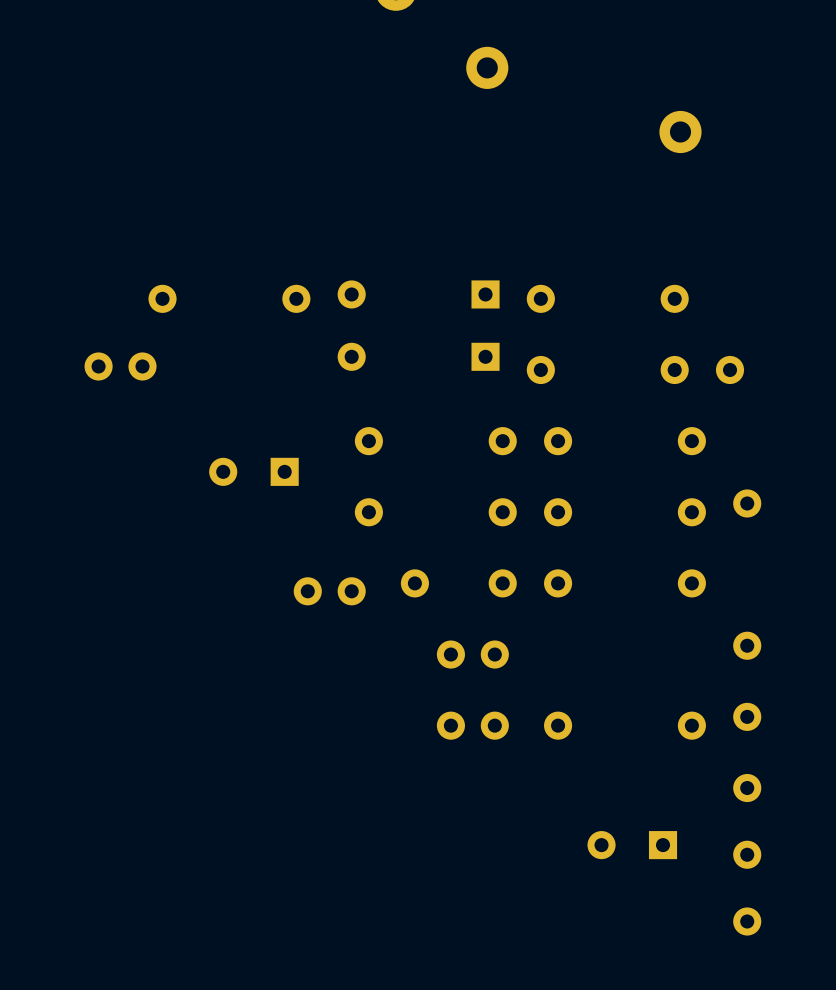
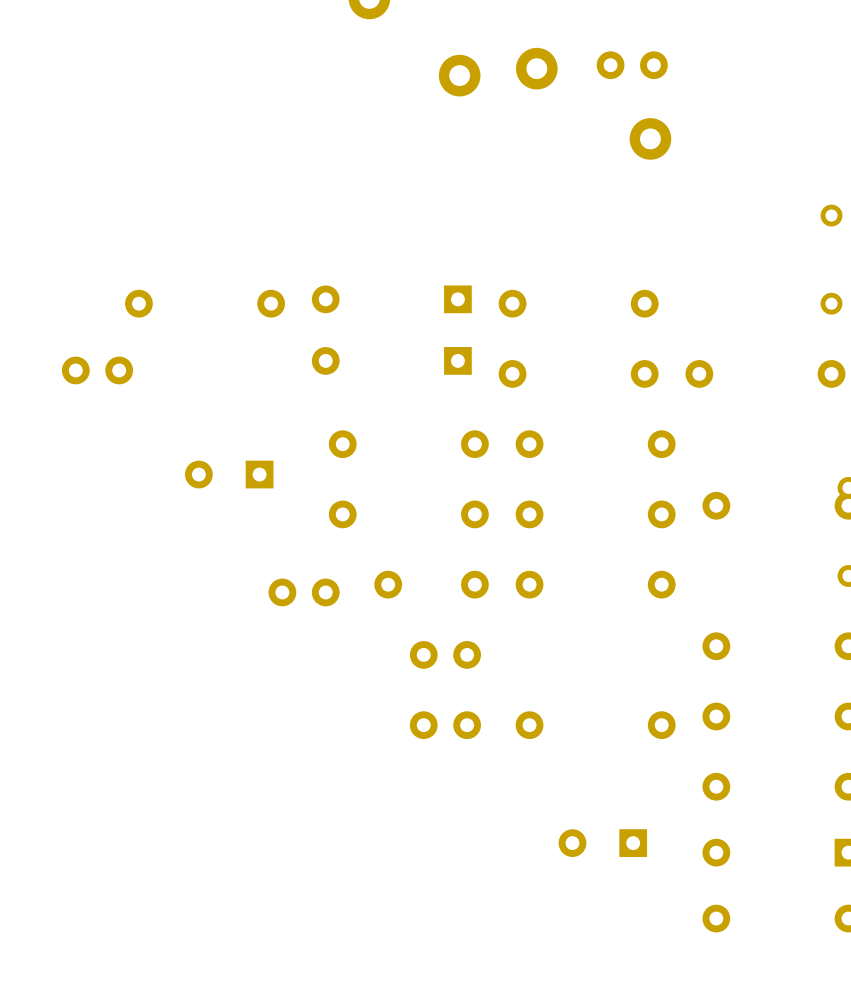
part: none -> (632, 65)
part: none -> (536, 68)

